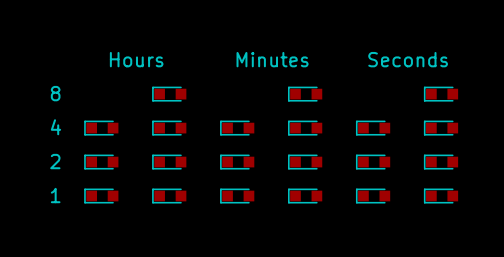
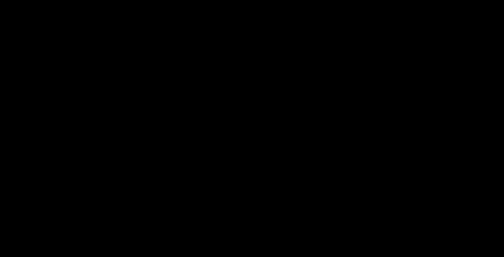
text: Hours (136, 59) -> none
text: Minutes (272, 59) -> none
text: Seconds (408, 59) -> none
text: 8 (55, 93) -> none
part: (169, 94) -> none
part: (305, 94) -> none
part: (441, 94) -> none
text: 4 (55, 127) -> none
part: (101, 128) -> none
part: (169, 128) -> none
part: (237, 128) -> none
part: (305, 128) -> none
part: (373, 128) -> none
part: (441, 128) -> none
text: 2 (55, 161) -> none
part: (101, 162) -> none
part: (169, 162) -> none
part: (237, 162) -> none
part: (305, 162) -> none
part: (373, 162) -> none
part: (441, 162) -> none
text: 1 (55, 195) -> none
part: (101, 196) -> none
part: (169, 196) -> none
part: (237, 196) -> none
part: (305, 196) -> none
part: (373, 196) -> none
part: (441, 196) -> none

